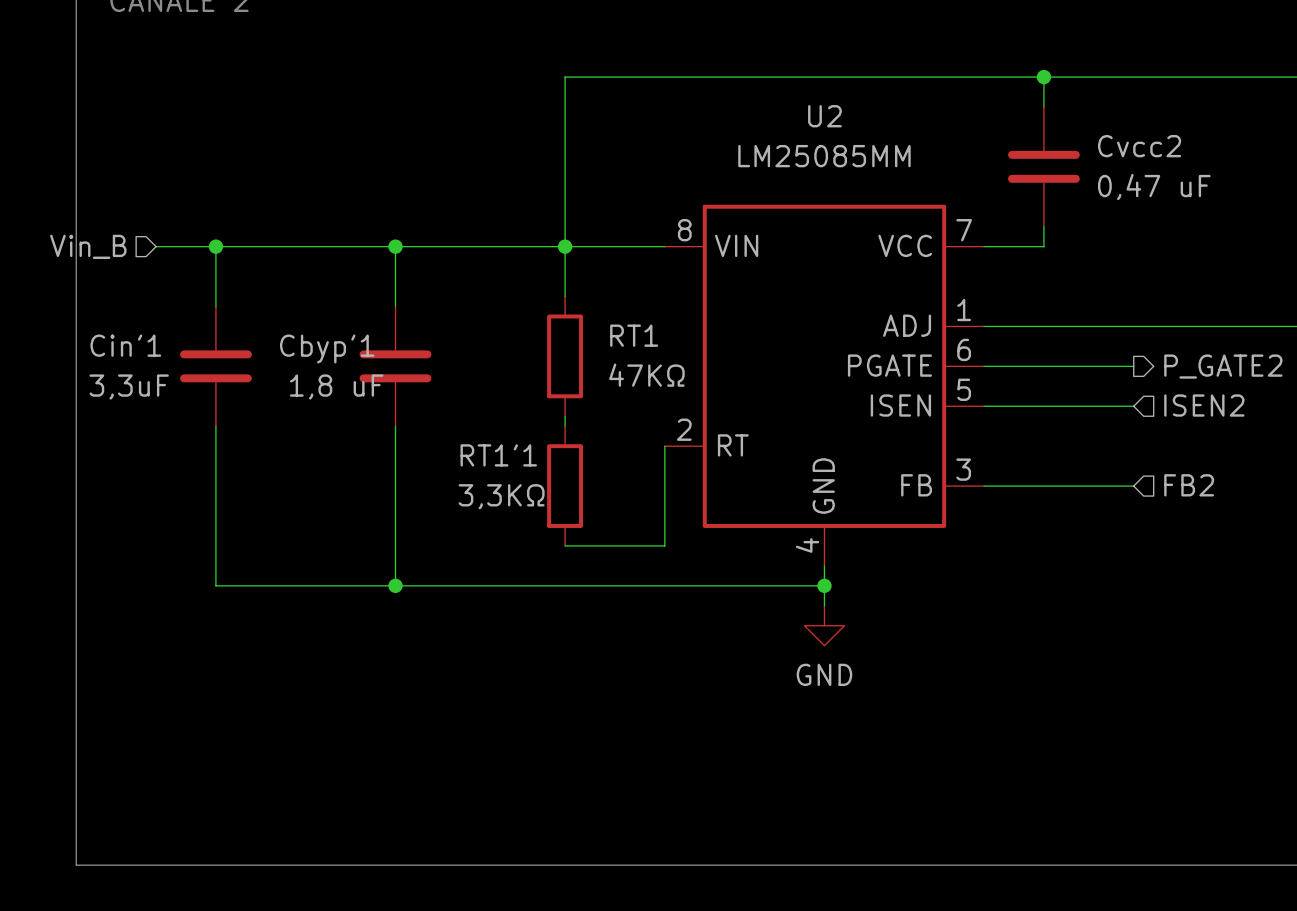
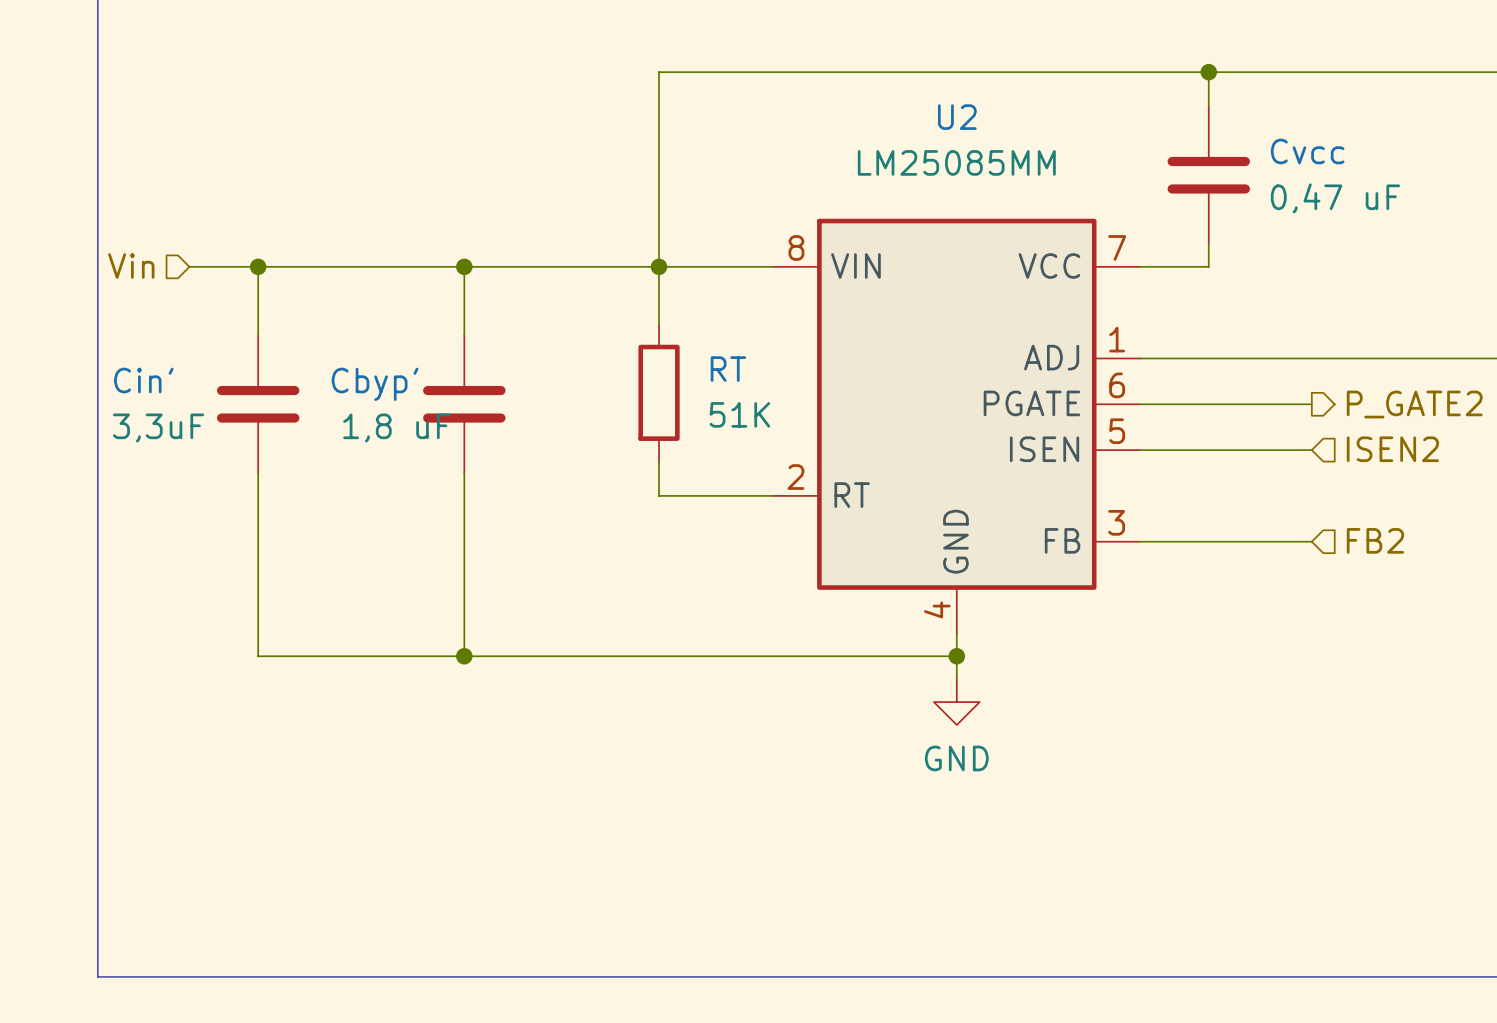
Cvcc2 name: Cvcc2 (1139, 146) -> Cvcc (1307, 151)
hierarchical label: Vin_B (88, 246) -> Vin (131, 266)
RT1 name: RT1 (634, 335) -> RT (728, 369)
Cin'1 name: Cin'1 (125, 345) -> Cin' (143, 380)
Cbyp'1 name: Cbyp'1 (327, 348) -> Cbyp' (375, 384)
RT1 value: 47KΩ (646, 375) -> 51K (739, 414)
wire: (664, 446) (664, 545) (565, 545) -> (773, 495) (659, 495) (659, 473)
RT1'1: 3,3KΩ (565, 486) -> none

